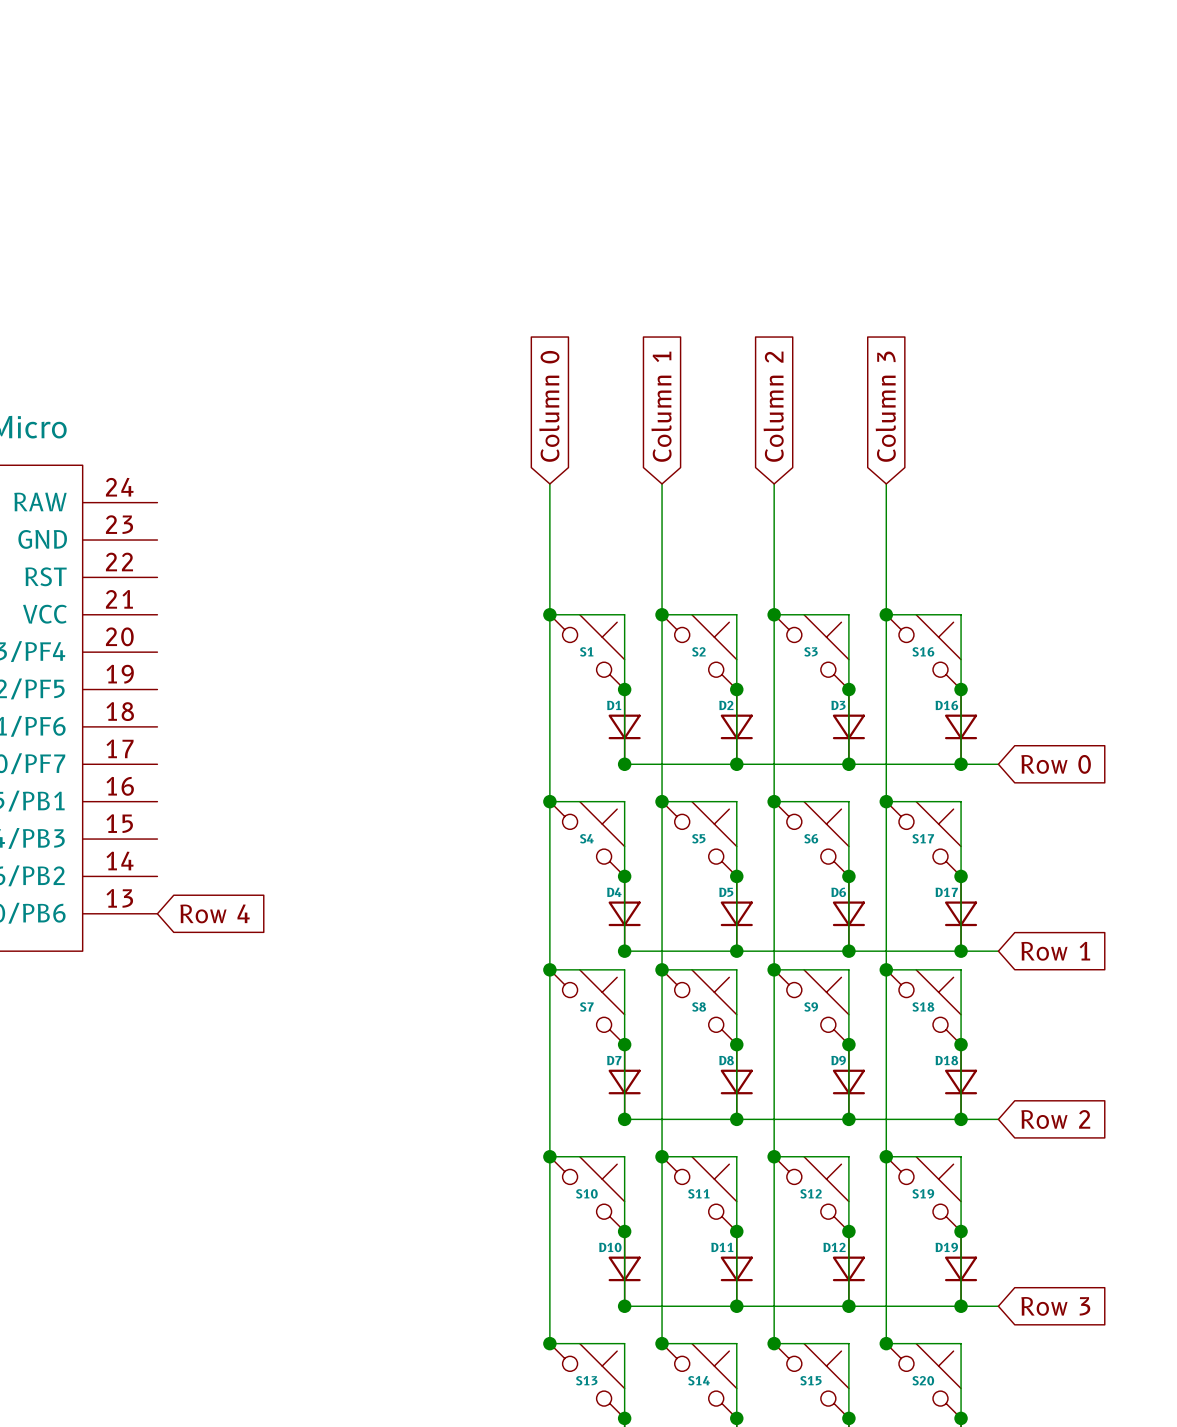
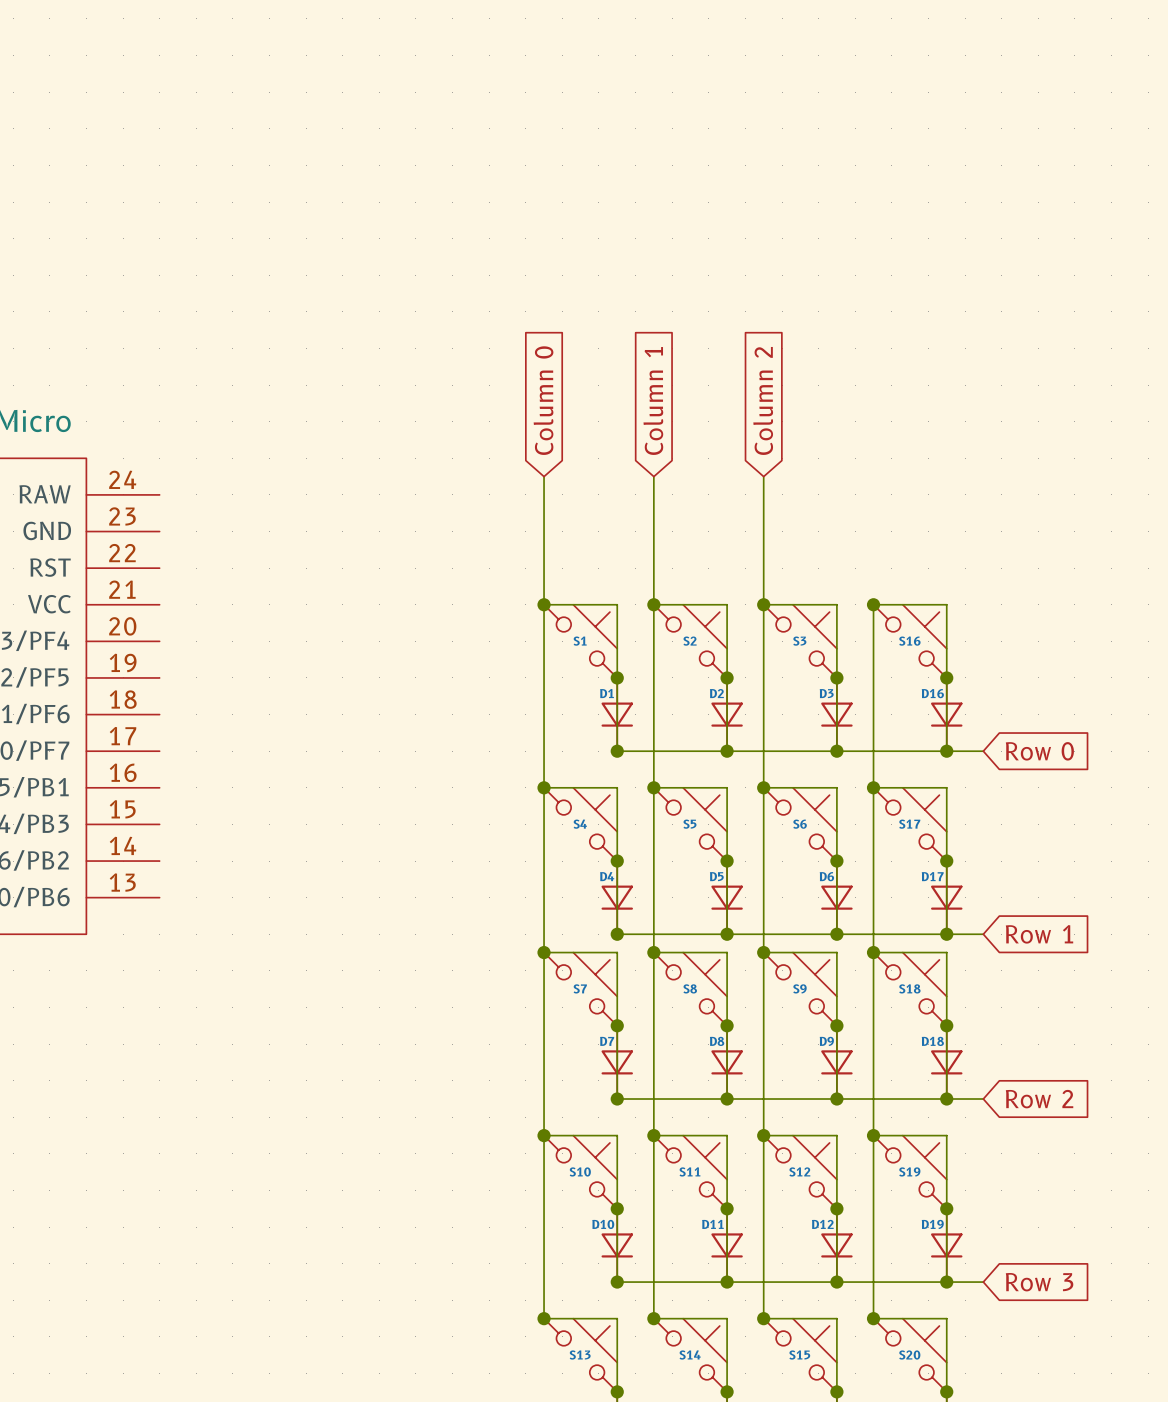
global label: Column 3 (885, 406) -> none
wire: (886, 483) (886, 614) -> none
global label: Row 4 (215, 913) -> none

